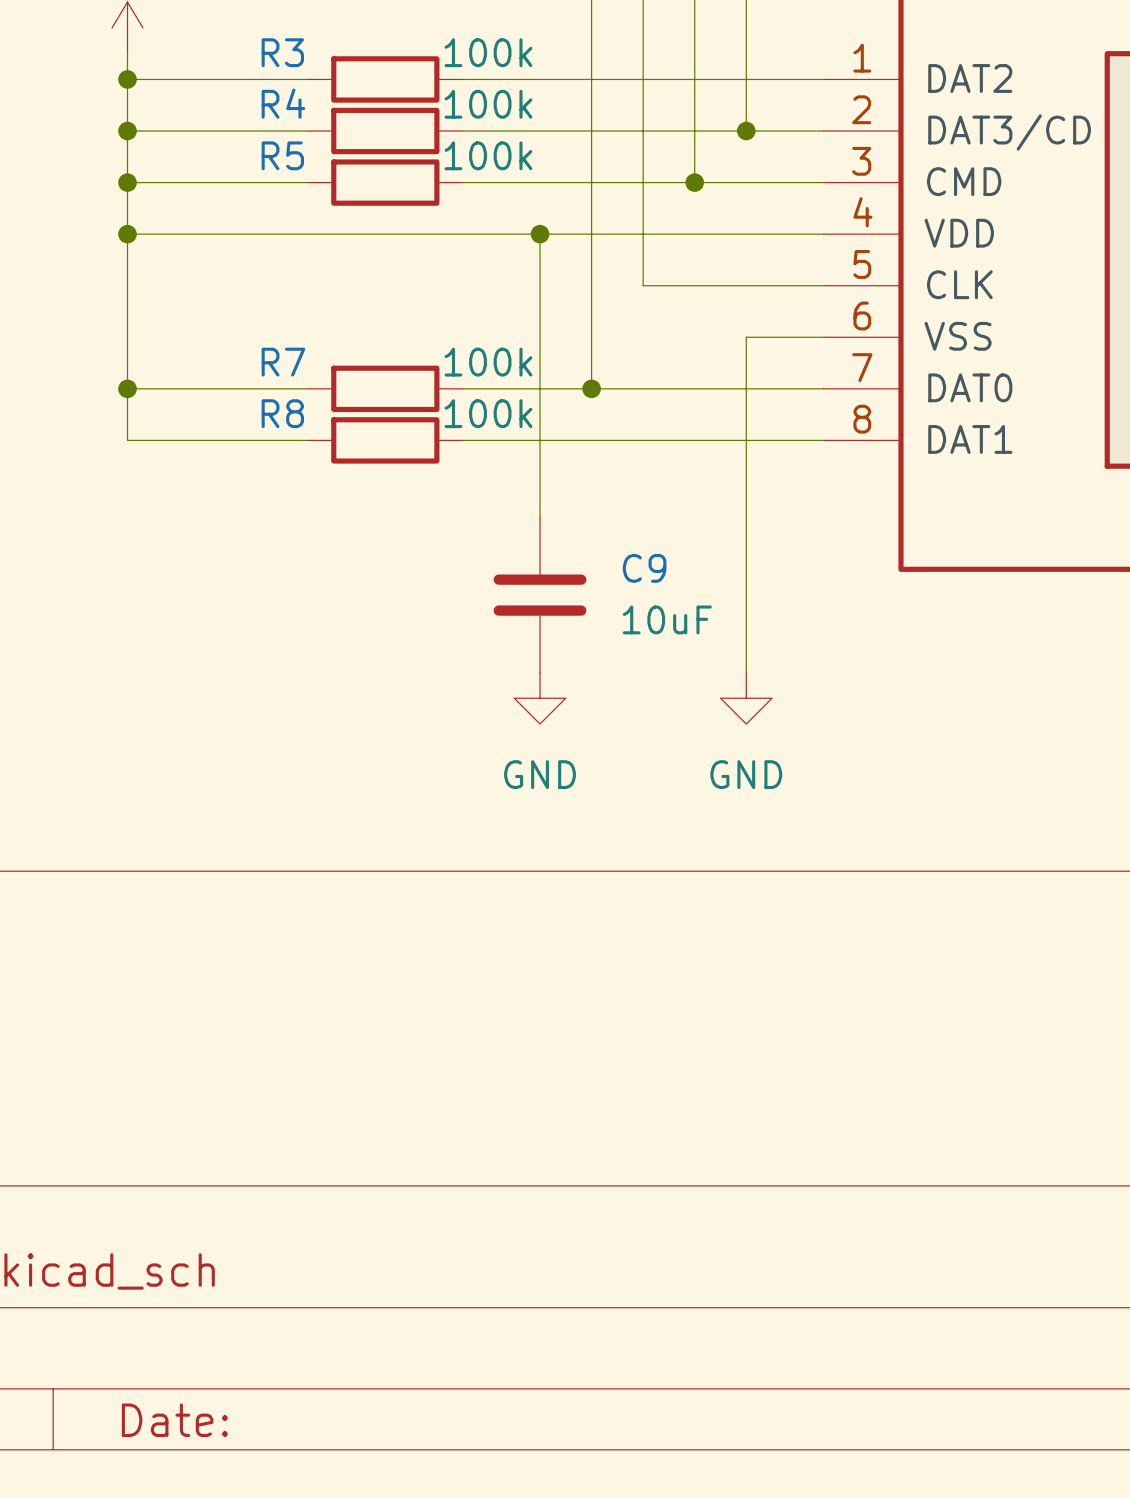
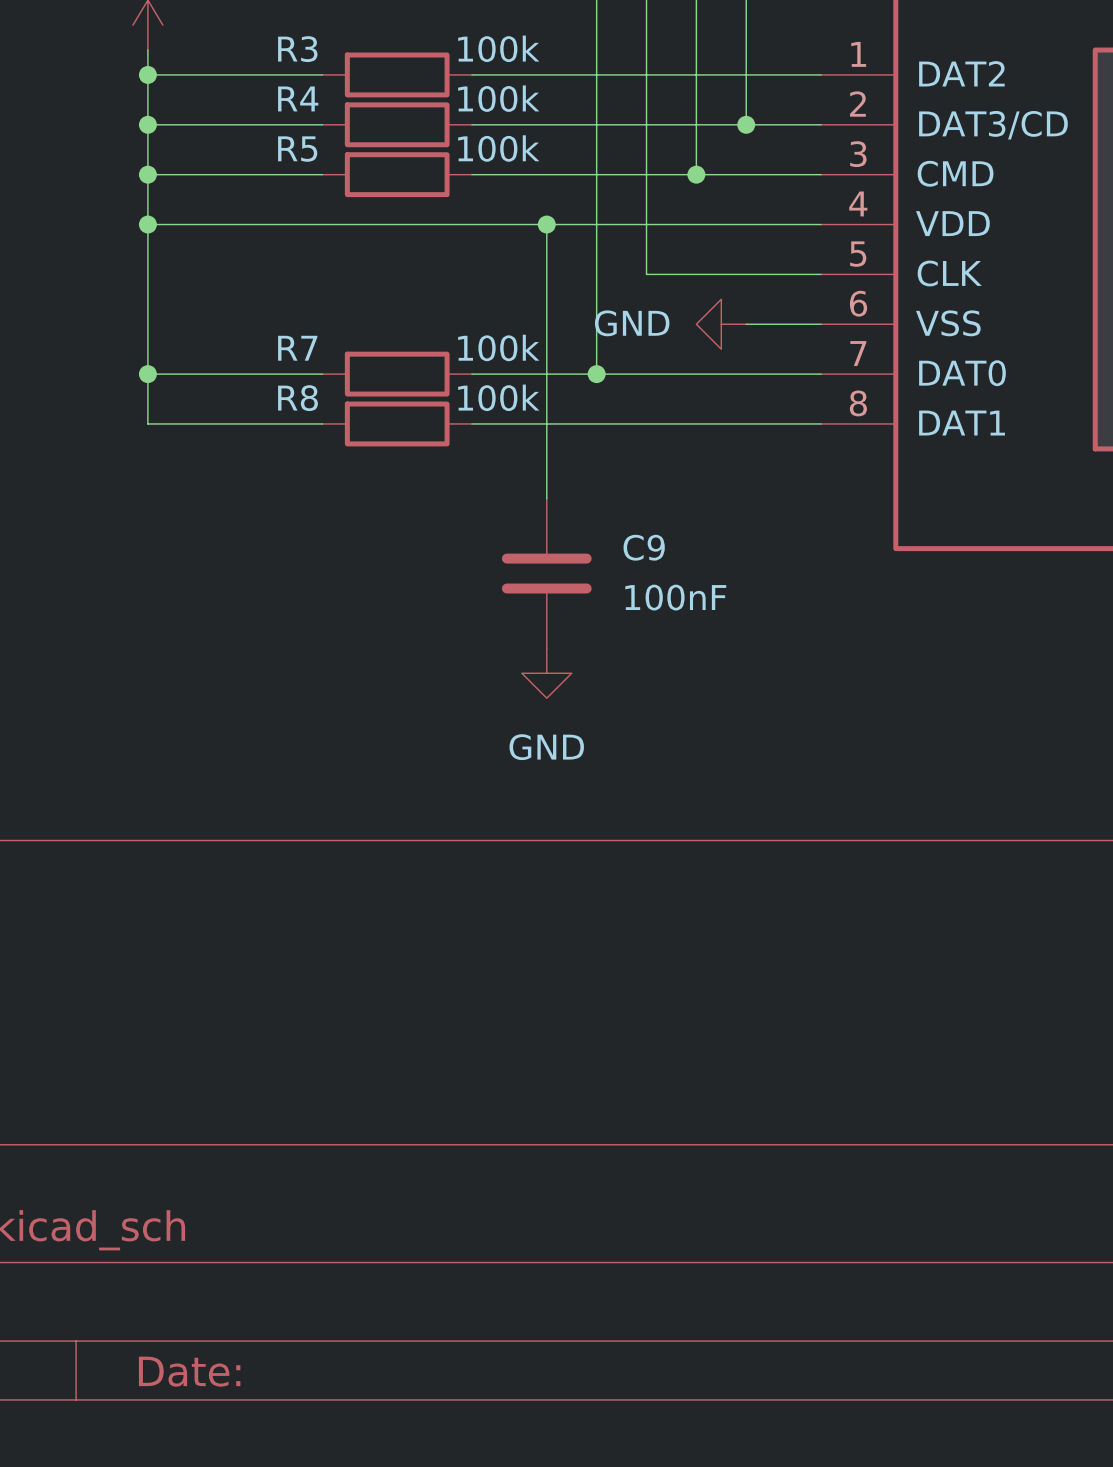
wire: (746, 337) (746, 672) -> none
C9 value: 10uF (667, 619) -> 100nF (675, 597)
power symbol rotation: 0° (746, 698) -> 90° clockwise (721, 324)
power symbol position: GND (746, 698) -> GND (721, 324)

